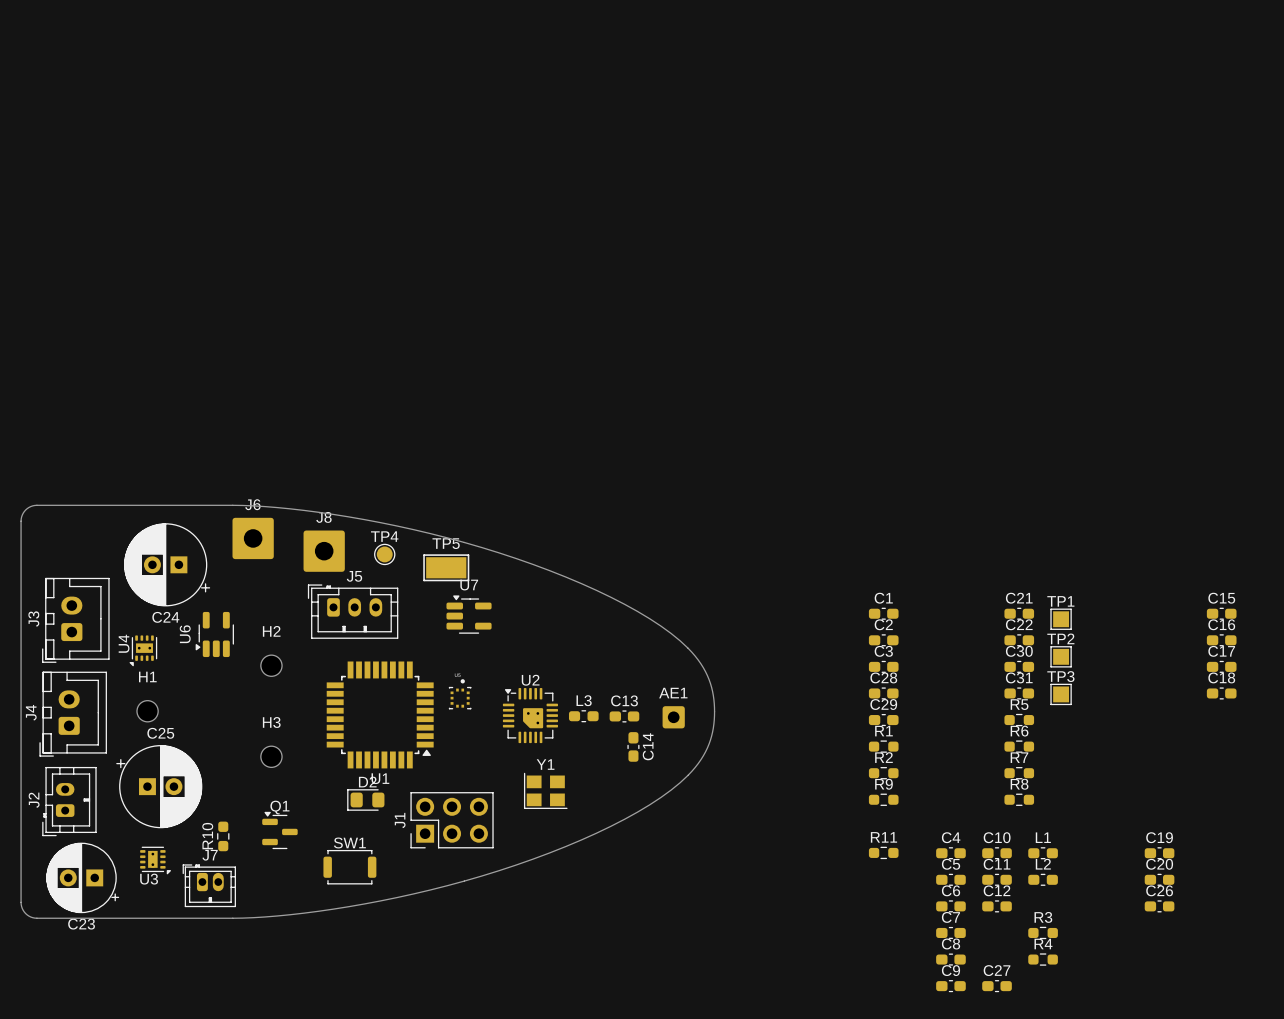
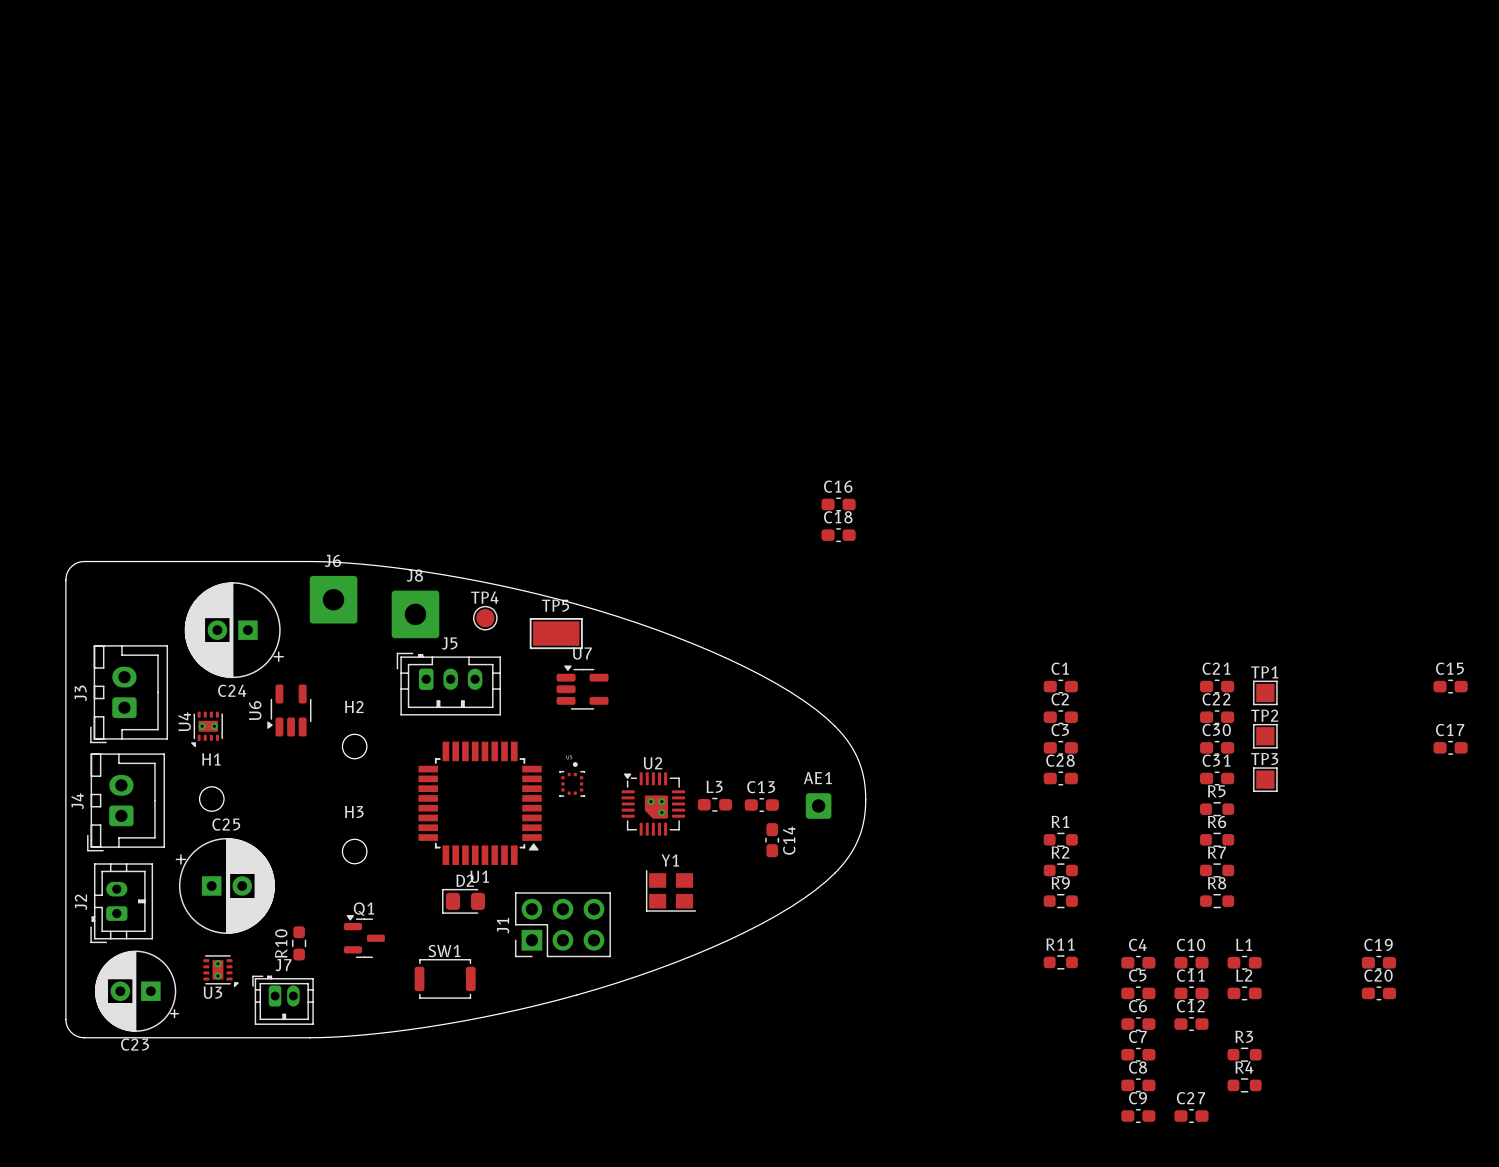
C16 position: (1221, 640) -> (838, 504)
C18 position: (1221, 693) -> (838, 535)
C29: (883, 720) -> none
C26: (1159, 906) -> none

